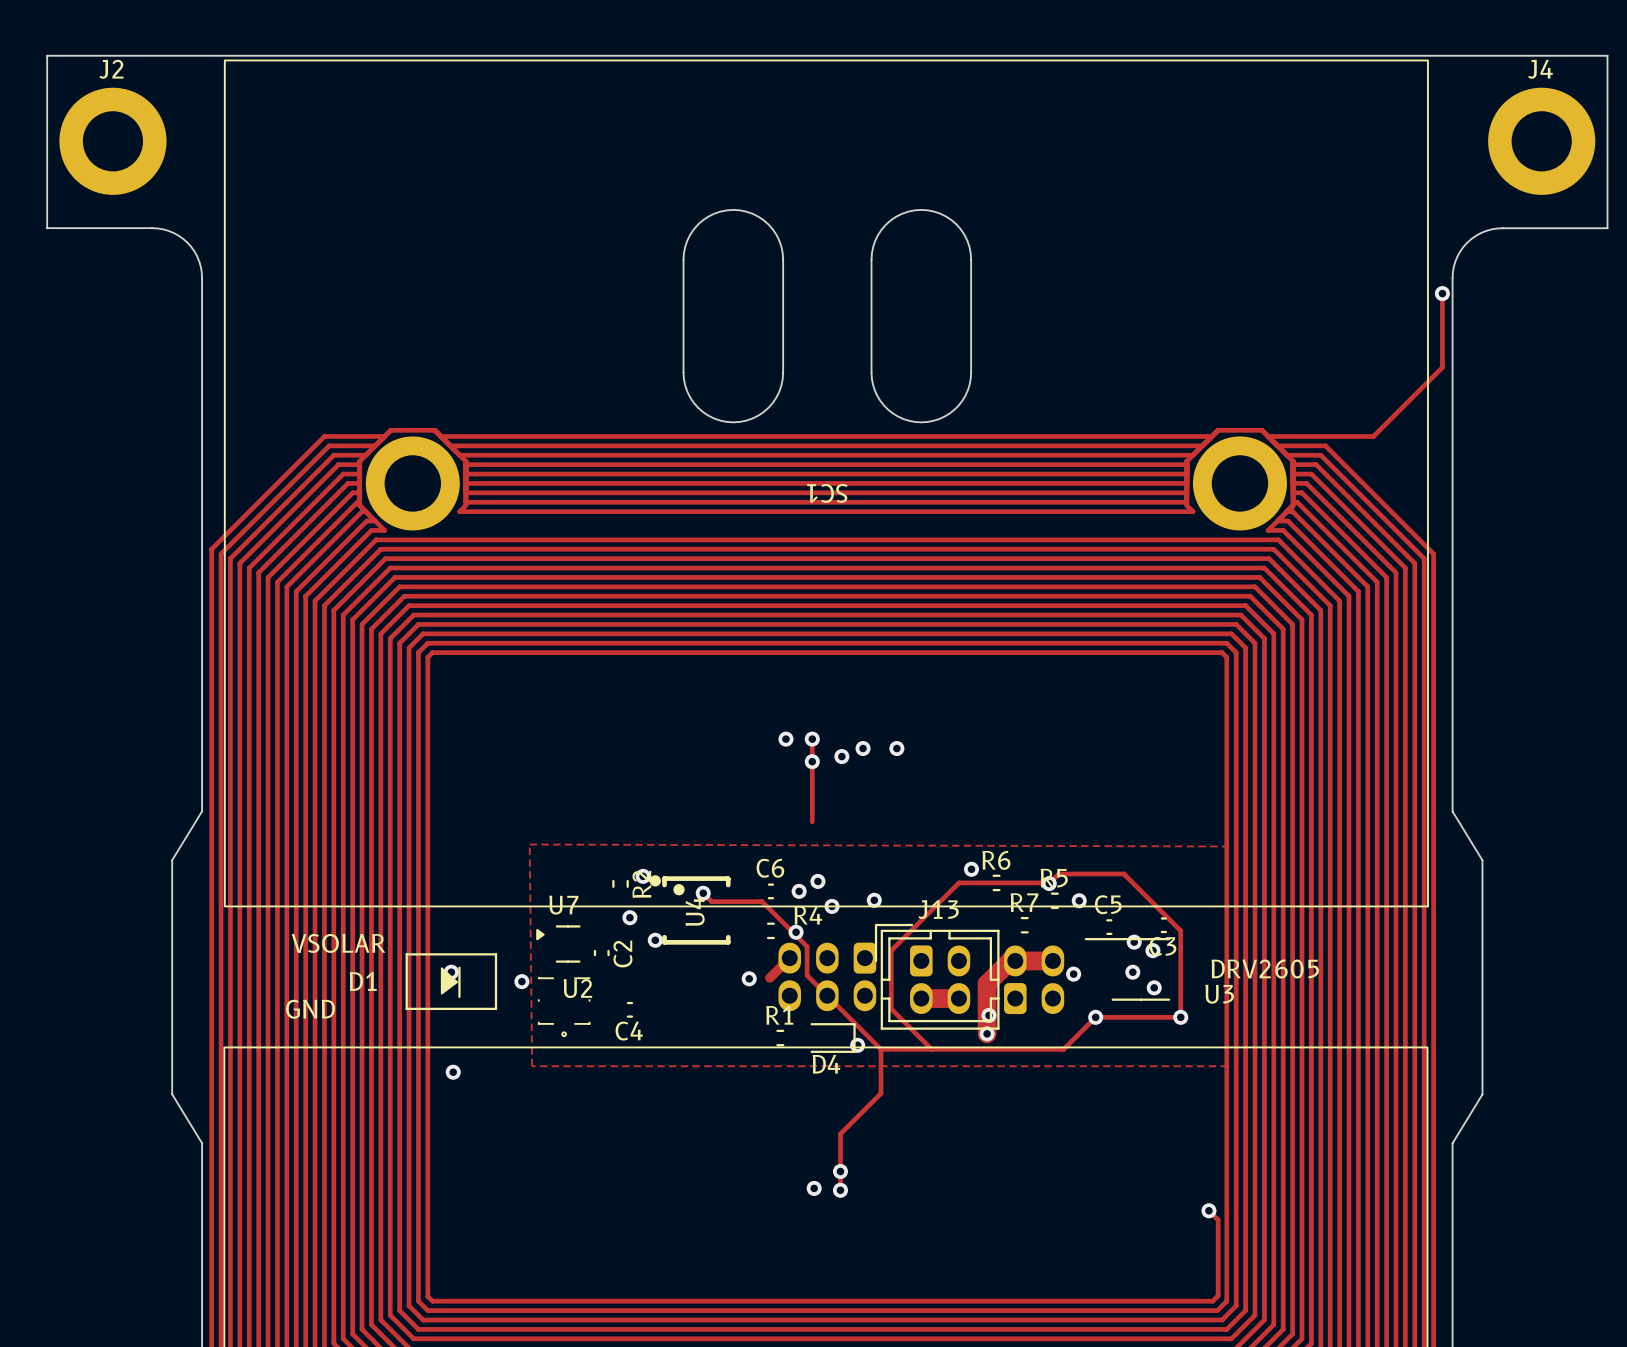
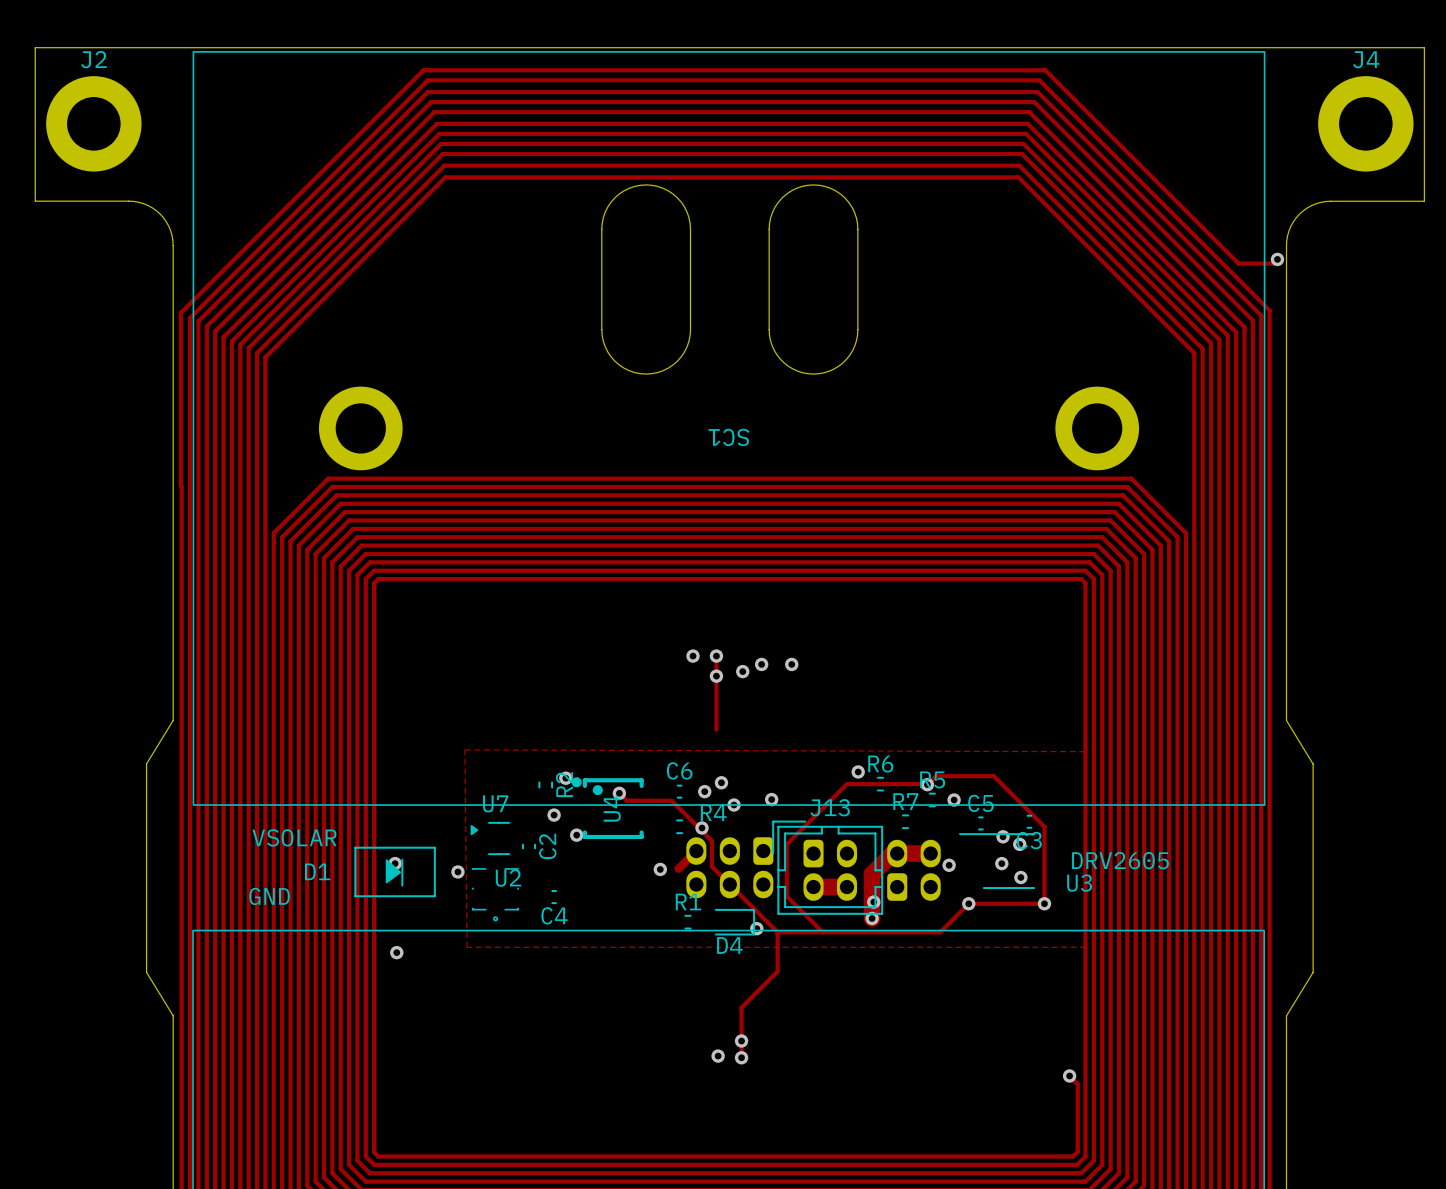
track: (1442, 293) (1442, 367) (1373, 436) (1268, 436) -> (1277, 259) (1273, 263) (1238, 263) (1045, 70) (423, 70) (180, 312) (181, 487)
track: (384, 436) (324, 436) (211, 549) -> none
track: (440, 436) (1211, 436) -> none
track: (375, 445) (329, 445) (221, 553) -> none
track: (450, 445) (1202, 445) -> none
track: (1277, 445) (1325, 445) (1433, 553) -> (190, 491) (190, 317) (427, 80) (1039, 80) (1269, 310) (1269, 491)
track: (365, 455) (333, 455) (230, 558) -> none
track: (459, 455) (1193, 455) -> none
track: (1286, 455) (1320, 455) (1424, 558) -> (198, 495) (198, 321) (427, 92) (1037, 92) (1261, 315) (1261, 495)
track: (359, 464) (338, 464) (239, 563) -> none
track: (465, 464) (1186, 464) -> none
track: (1293, 464) (1316, 464) (1414, 563) -> (206, 499) (206, 326) (431, 102) (1034, 102) (1252, 320) (1252, 499)
track: (359, 474) (343, 474) (249, 568) -> none
track: (465, 474) (1186, 474) -> none
track: (1293, 474) (1311, 474) (1405, 568) -> (215, 503) (215, 331) (434, 112) (1029, 112) (1244, 327) (1244, 503)
track: (359, 483) (347, 483) (258, 572) -> none
track: (465, 483) (1186, 483) -> none
track: (1293, 483) (1306, 483) (1396, 572) -> (223, 507) (223, 337) (436, 123) (1027, 123) (1236, 332) (1236, 507)
track: (359, 492) (352, 492) (268, 577) -> none
track: (465, 492) (1186, 492) -> none
track: (1293, 492) (1302, 492) (1386, 577) -> (231, 512) (231, 341) (439, 133) (1026, 133) (1227, 335) (1227, 512)
track: (359, 502) (357, 502) (277, 582) -> none
track: (465, 502) (1186, 502) -> none
track: (1293, 502) (1297, 502) (1377, 582) -> (240, 516) (240, 344) (441, 143) (1023, 143) (1219, 339) (1219, 516)
track: (365, 511) (362, 511) (286, 586) -> none
track: (1286, 511) (1292, 511) (1367, 586) -> (248, 520) (248, 348) (442, 153) (1021, 153) (1211, 343) (1211, 520)
track: (375, 521) (366, 521) (296, 591) -> none
track: (1277, 521) (1287, 521) (1358, 591) -> (257, 524) (257, 353) (444, 165) (1019, 165) (1202, 348) (1202, 524)
track: (305, 596) (371, 530) (384, 530) (359, 505) (359, 461) (390, 430) (434, 430) (465, 461) (465, 505) (459, 511) (1193, 511) (1186, 505) (1186, 461) (1217, 430) (1261, 430) (1293, 461) (1293, 505) (1268, 530) (1283, 530) (1349, 596) -> (265, 528) (265, 357) (445, 177) (1018, 177) (1194, 353) (1194, 528)

